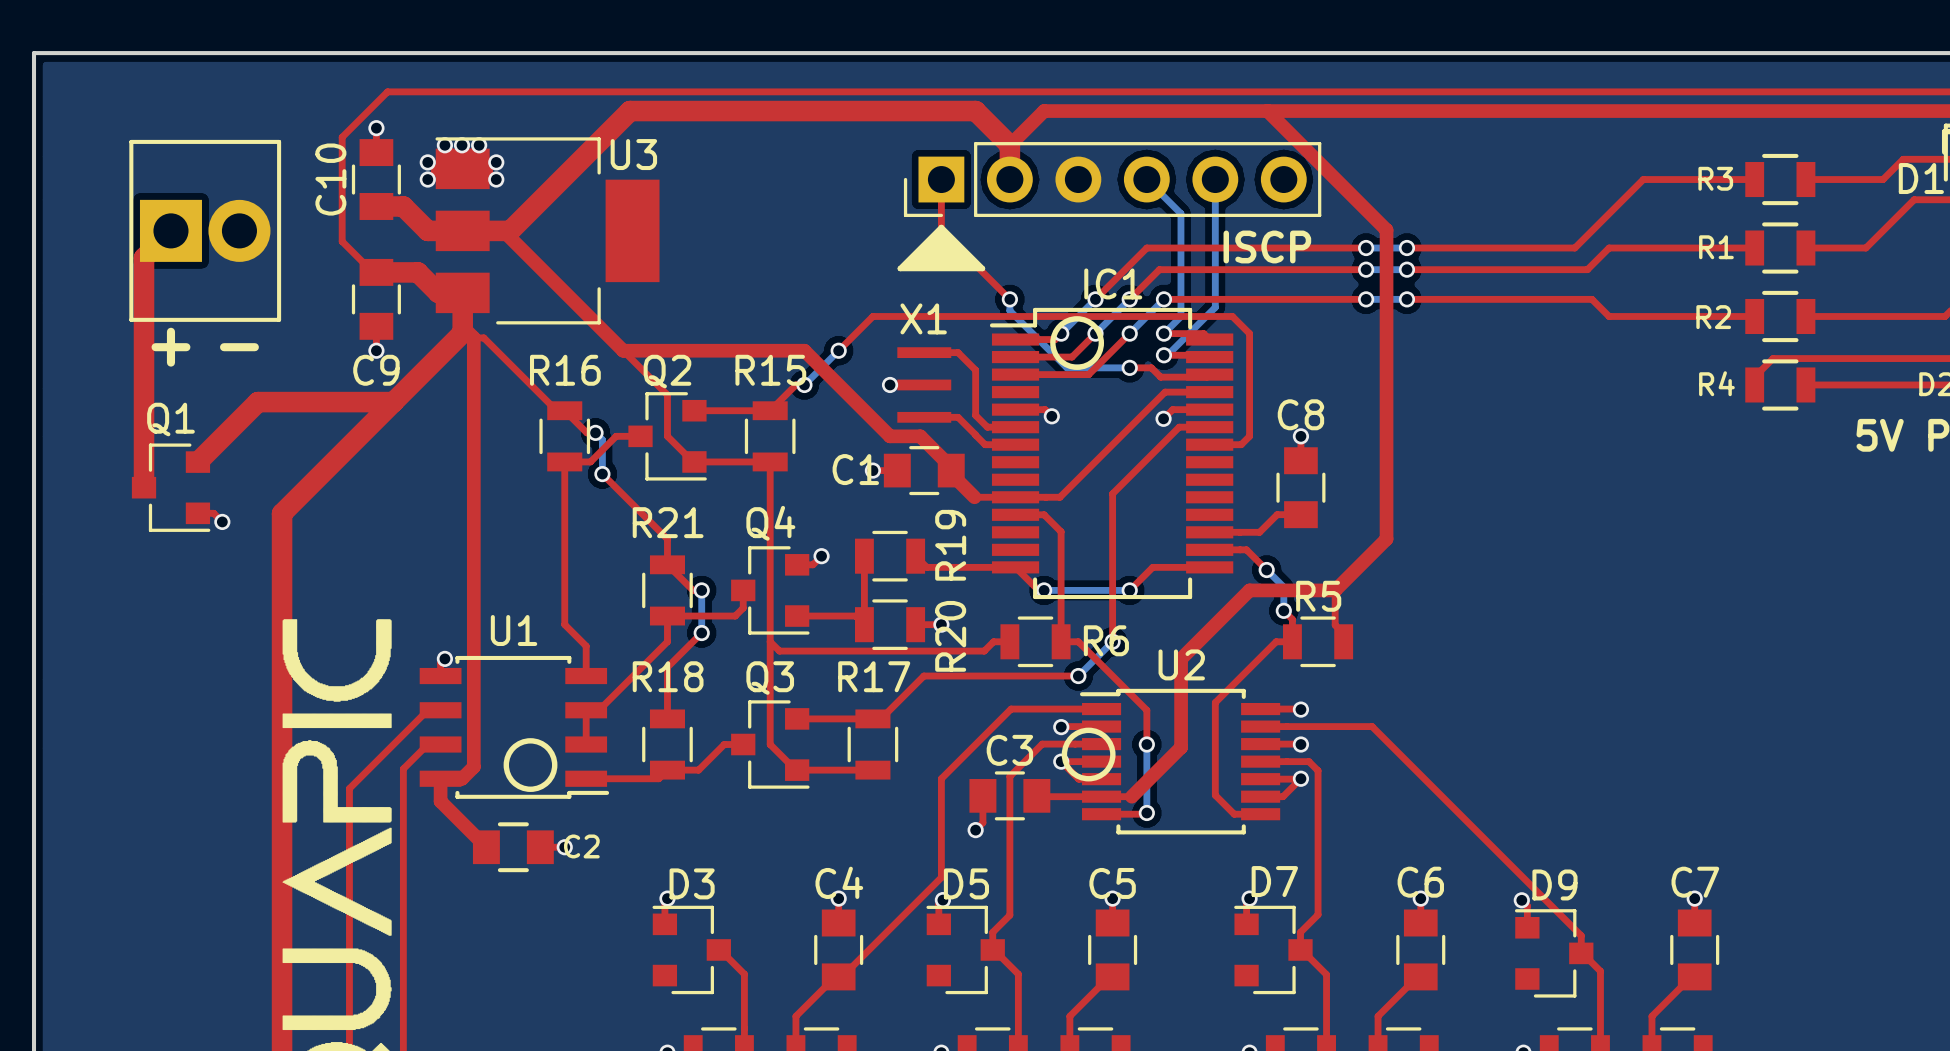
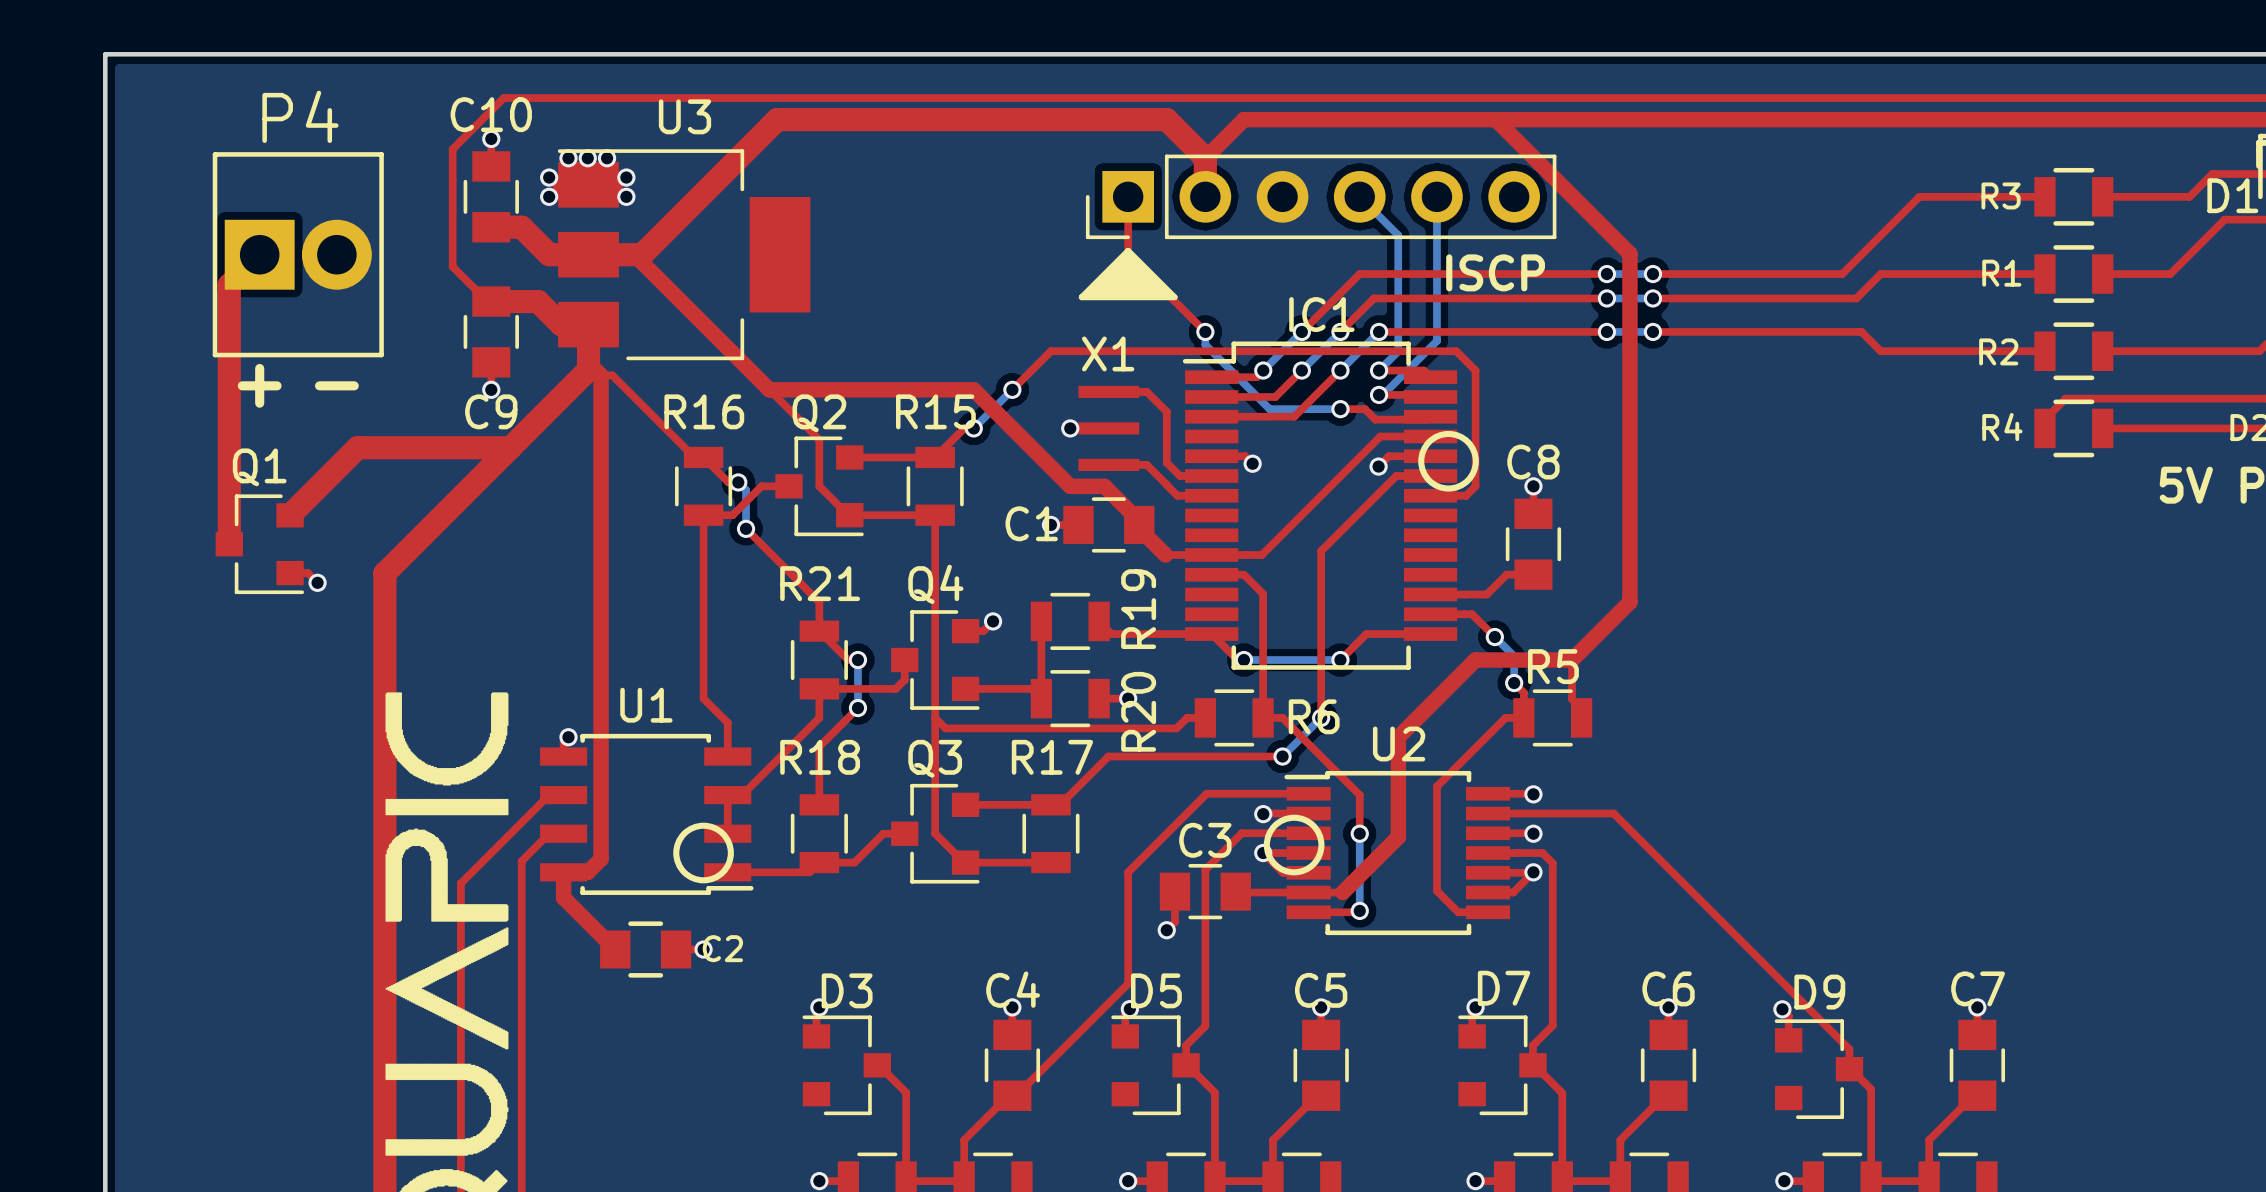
P4 name: none -> P4 (300, 116)
U3 name position: U3 (633, 154) -> U3 (685, 116)
C10 name rotation: 0° (330, 179) -> 90° clockwise (491, 114)
drawing position: (1077, 343) -> (1448, 461)
drawing position: (530, 765) -> (703, 853)

